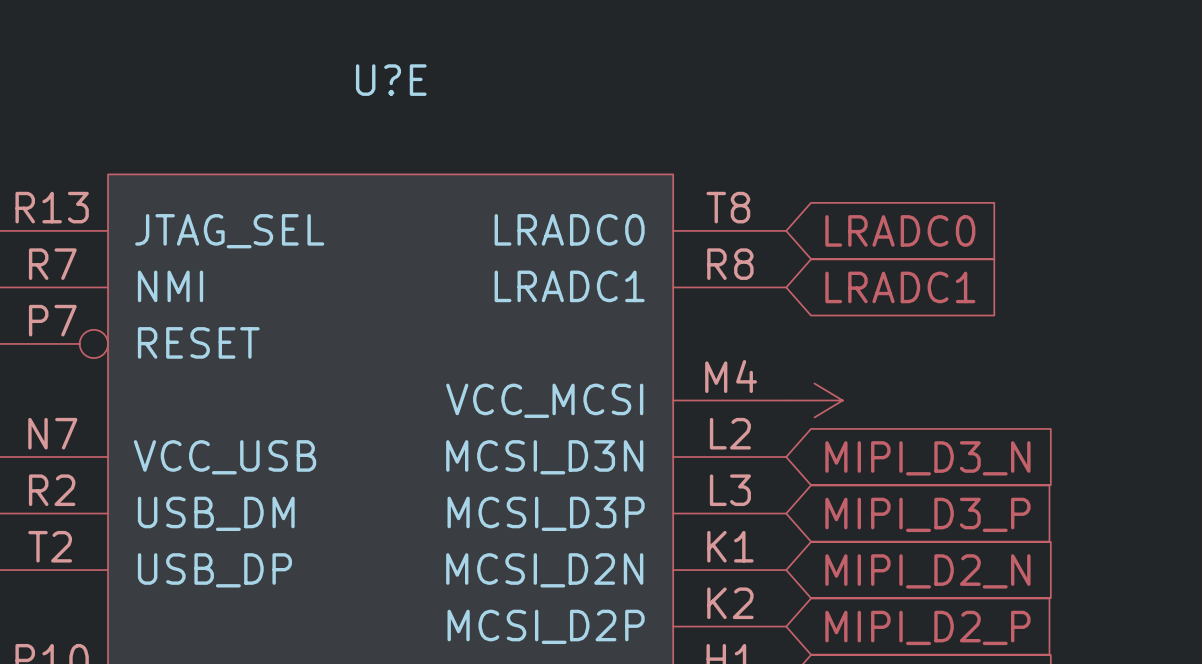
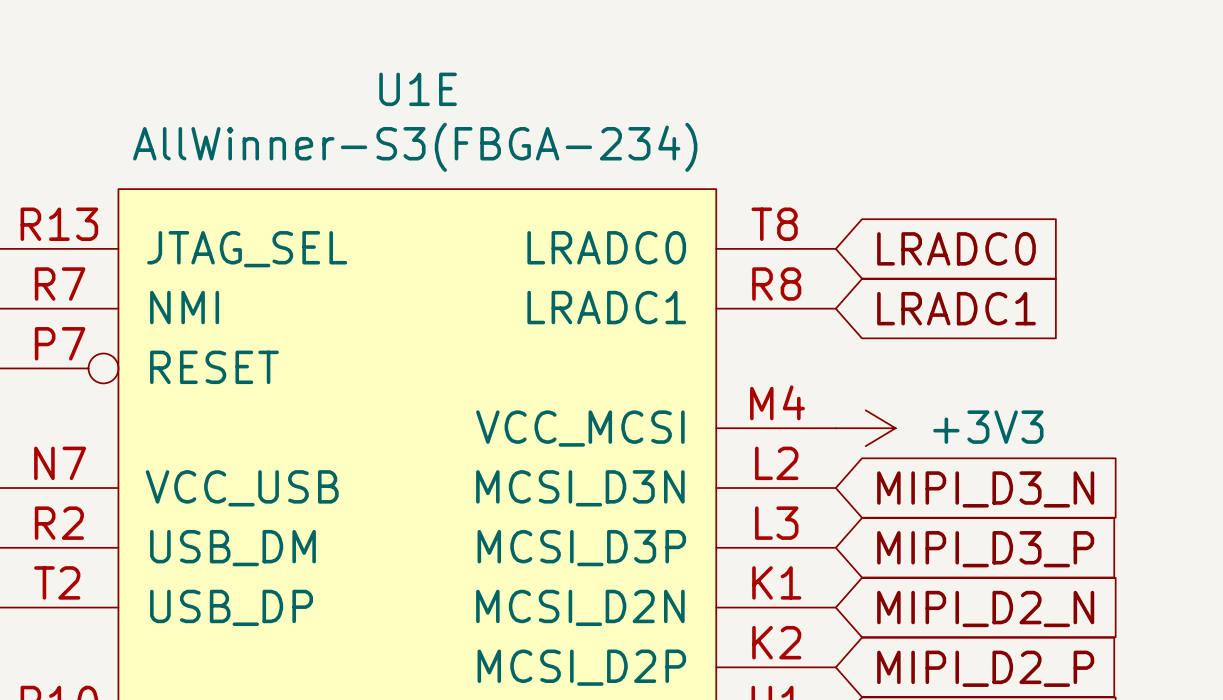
U?E name: U?E (391, 80) -> U1E (418, 89)
U?E value: none -> AllWinner-S3(FBGA-234) (415, 147)
power symbol text: none -> +3V3 (988, 427)

